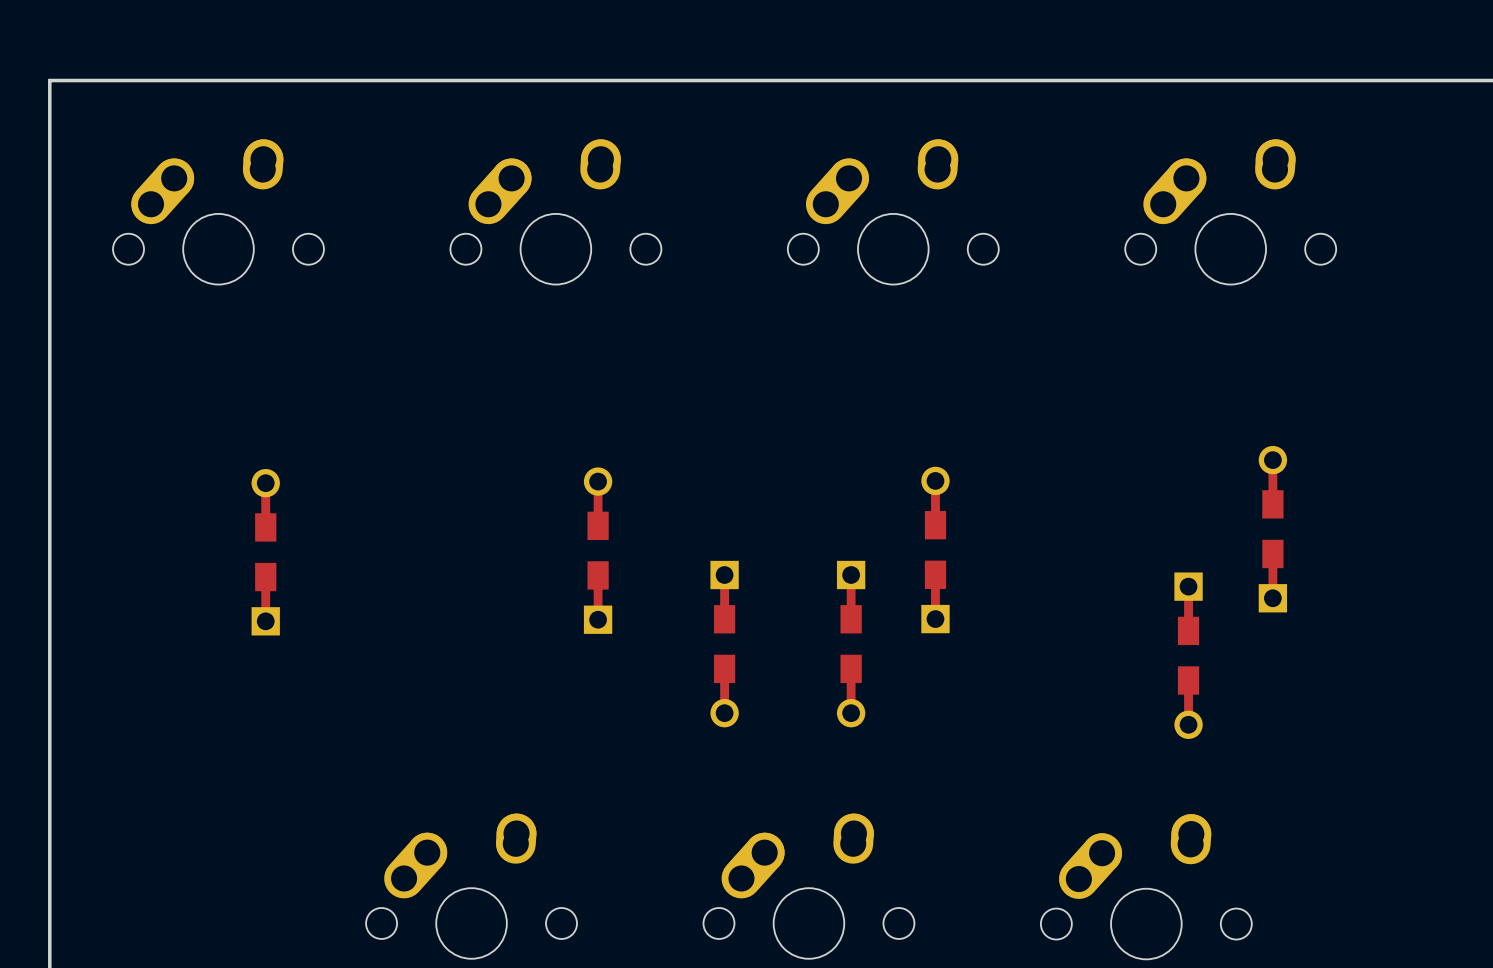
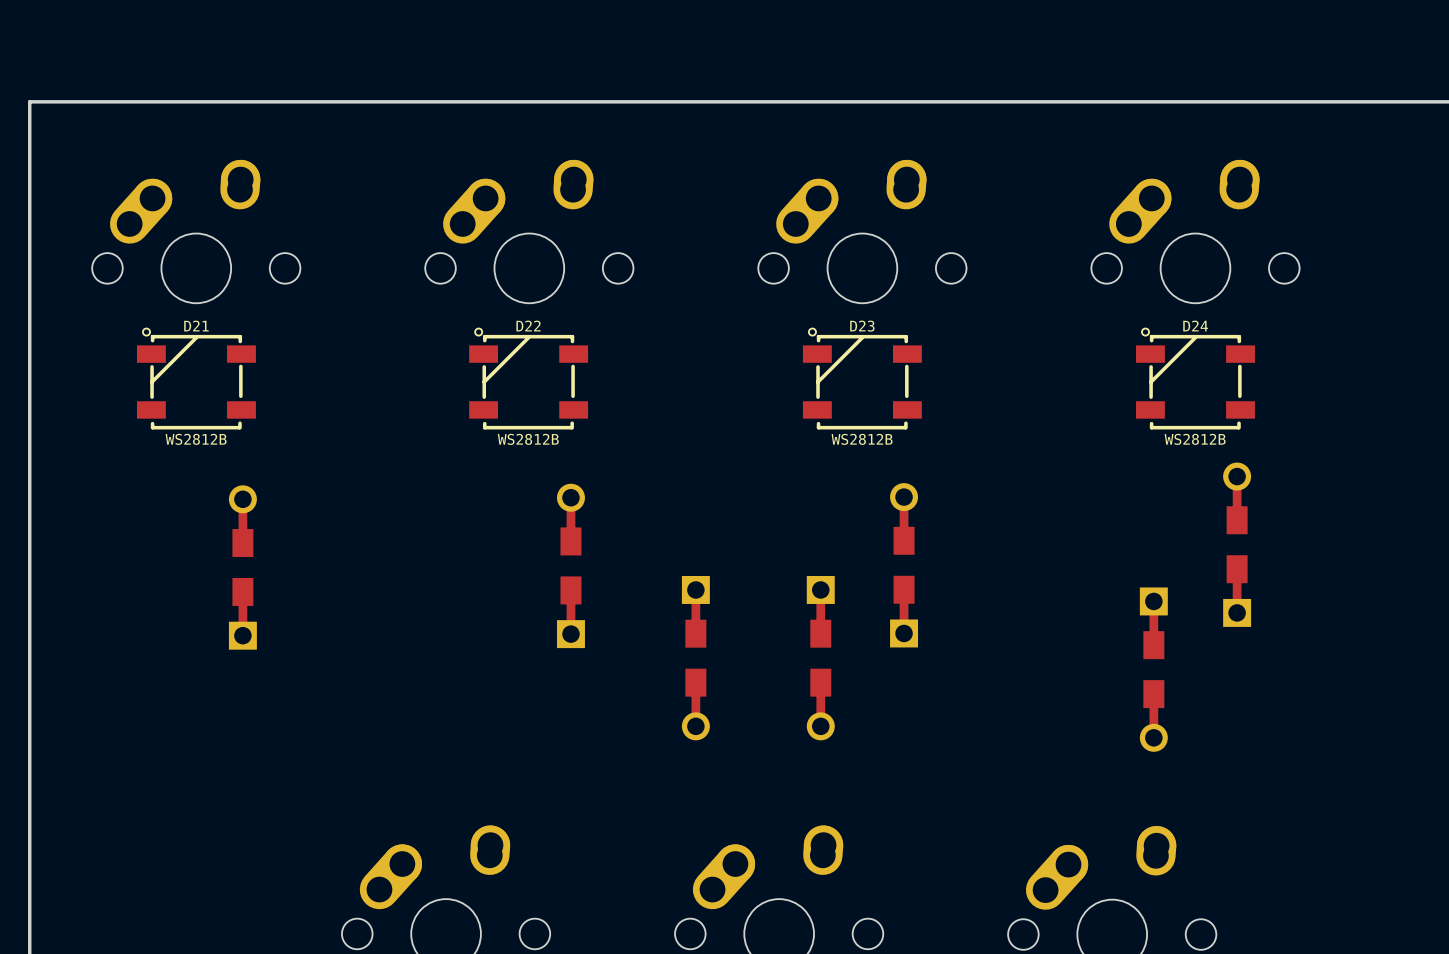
D21: none -> WS2812B (196, 383)
D22: none -> WS2812B (528, 383)
D23: none -> WS2812B (862, 383)
D24: none -> WS2812B (1195, 383)

